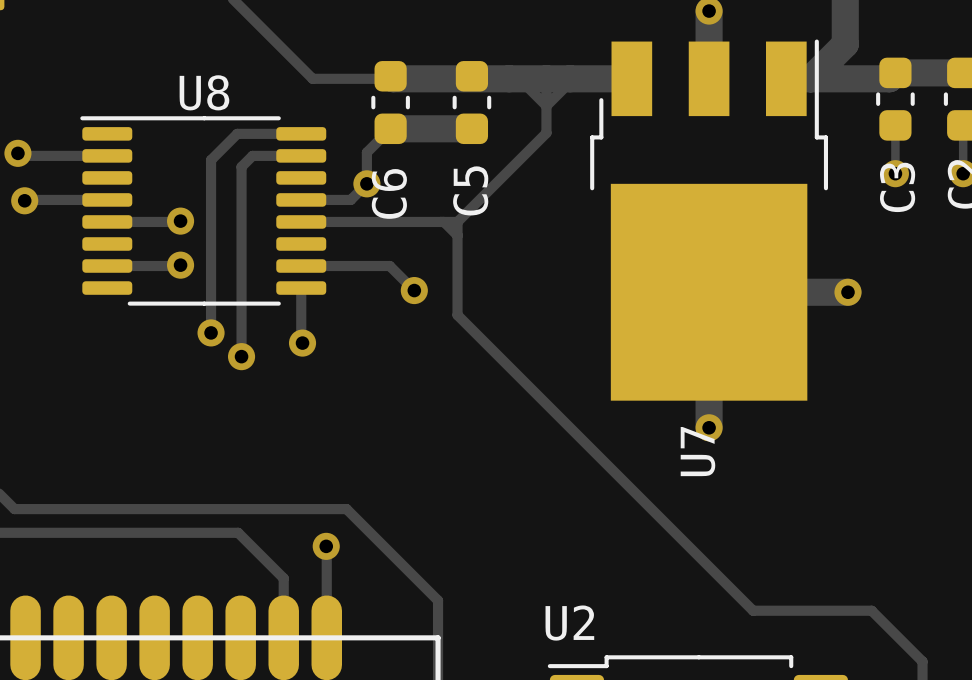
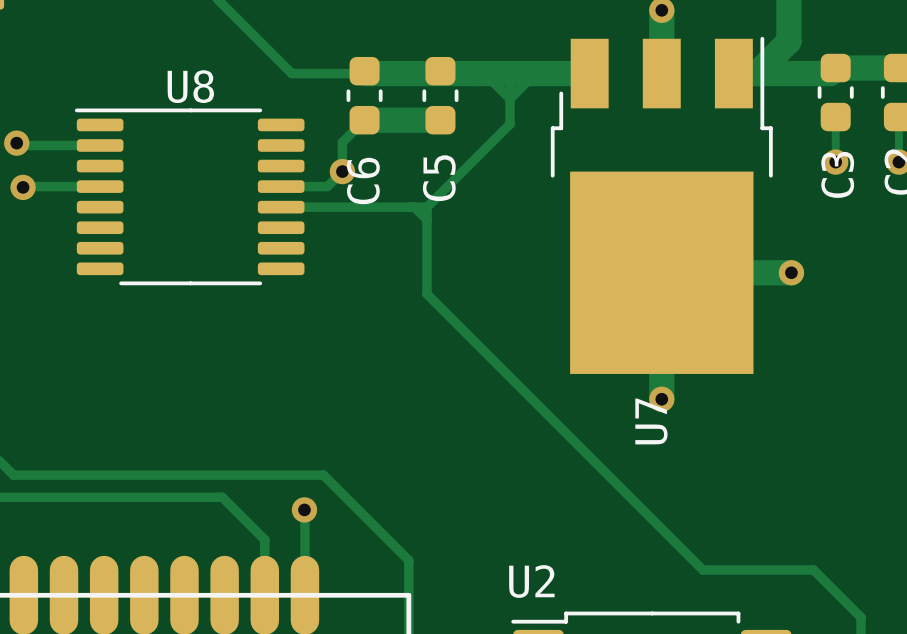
track: (301, 133) (237, 133) (211, 160) (211, 332) -> none
track: (301, 155) (252, 155) (241, 166) (241, 356) -> none
track: (180, 221) (107, 221) -> none
via: (180, 221) -> none
track: (180, 265) (107, 266) -> none
via: (180, 265) -> none
track: (301, 266) (389, 266) (414, 290) -> none
track: (301, 288) (302, 343) -> none
via: (414, 290) -> none
via: (211, 332) -> none
via: (302, 343) -> none
via: (241, 356) -> none

